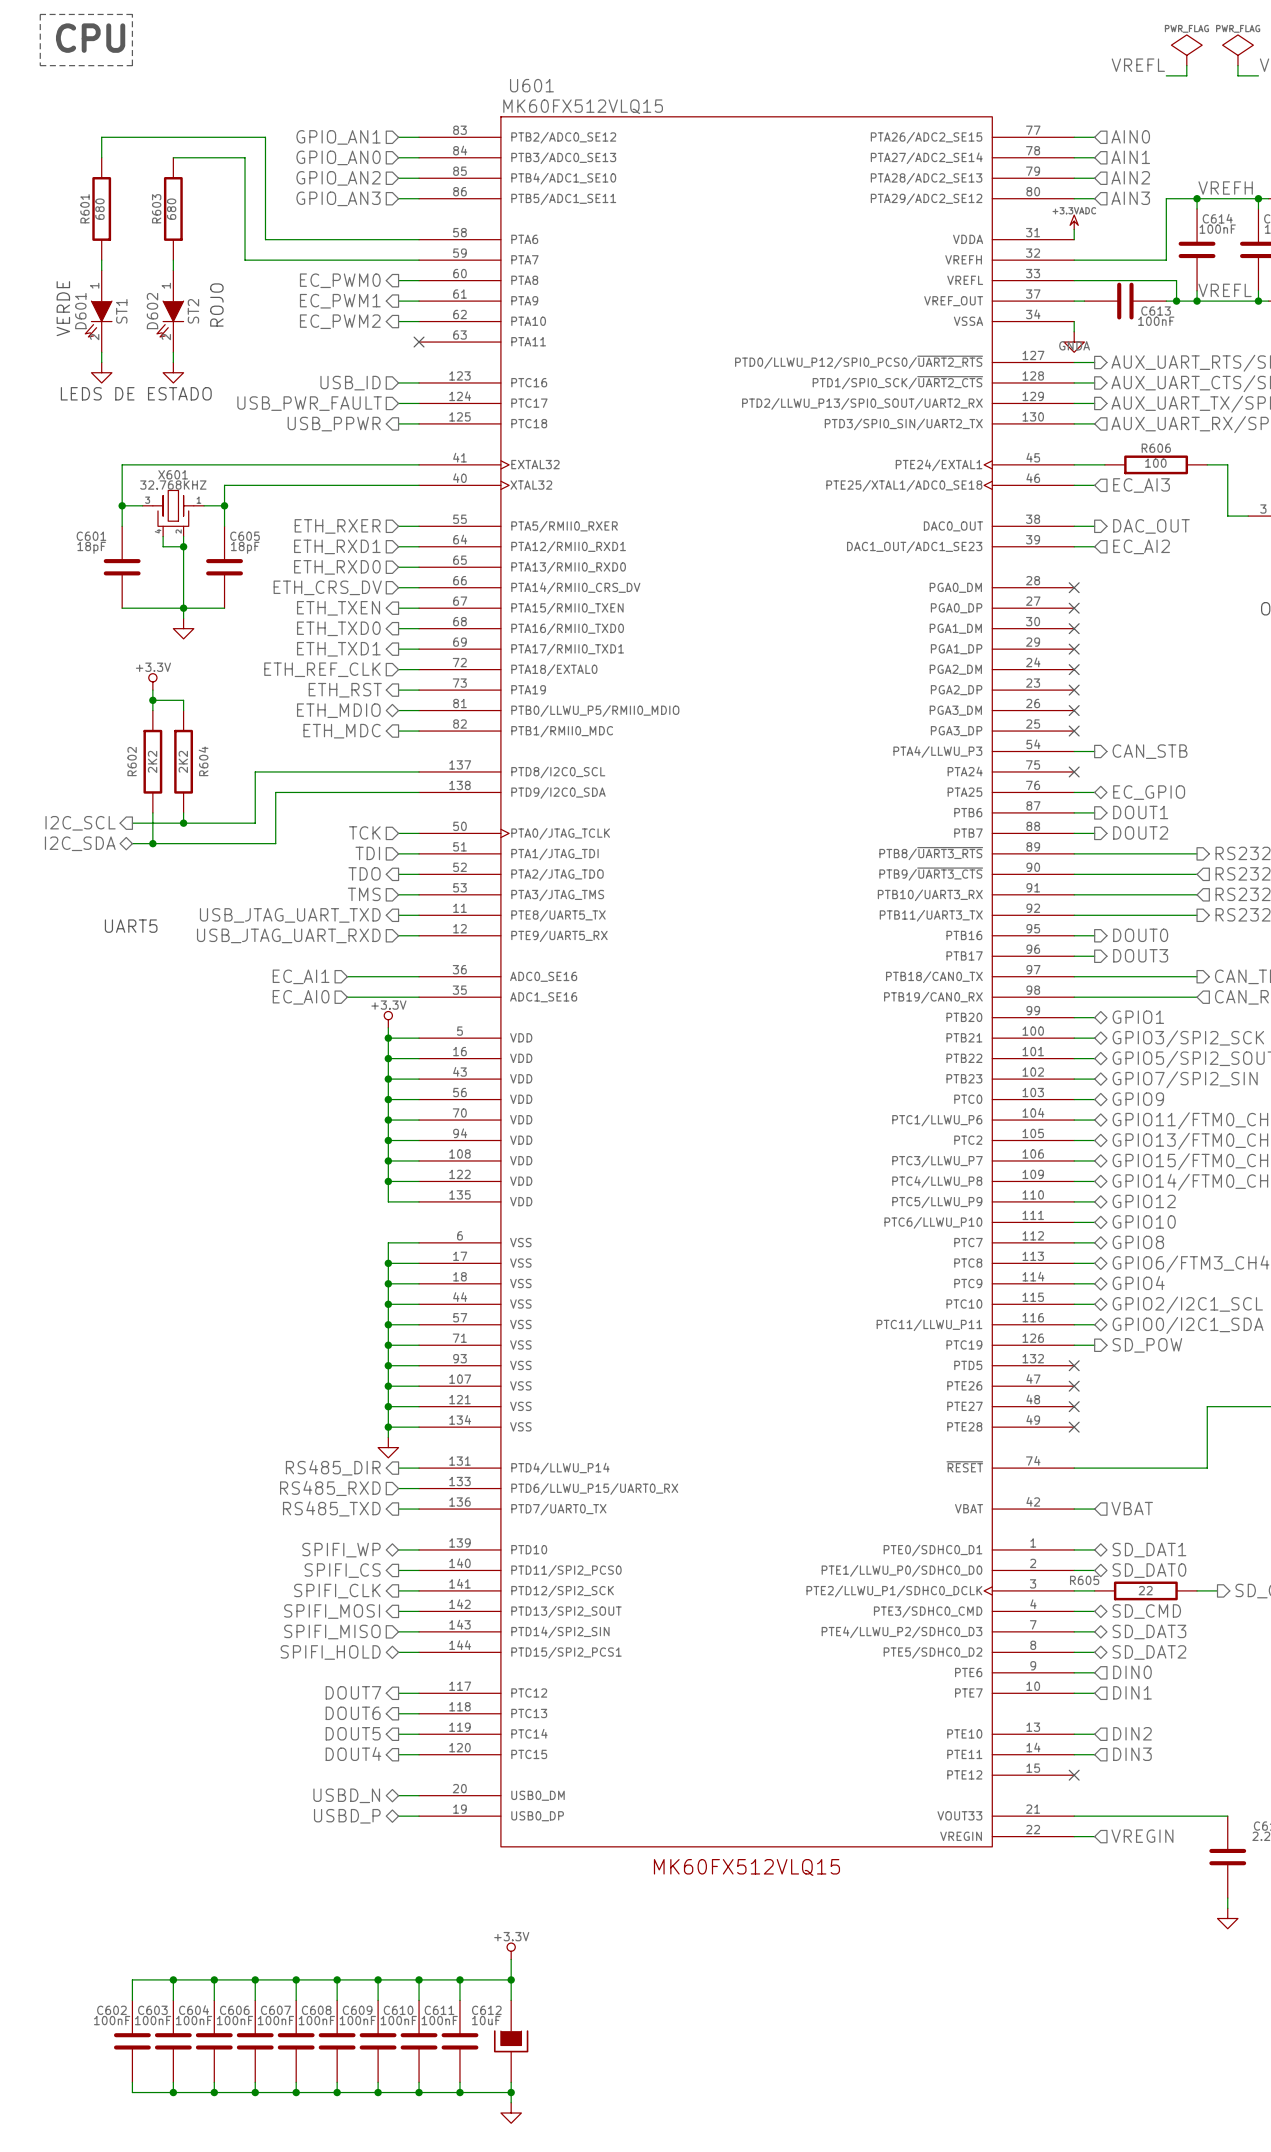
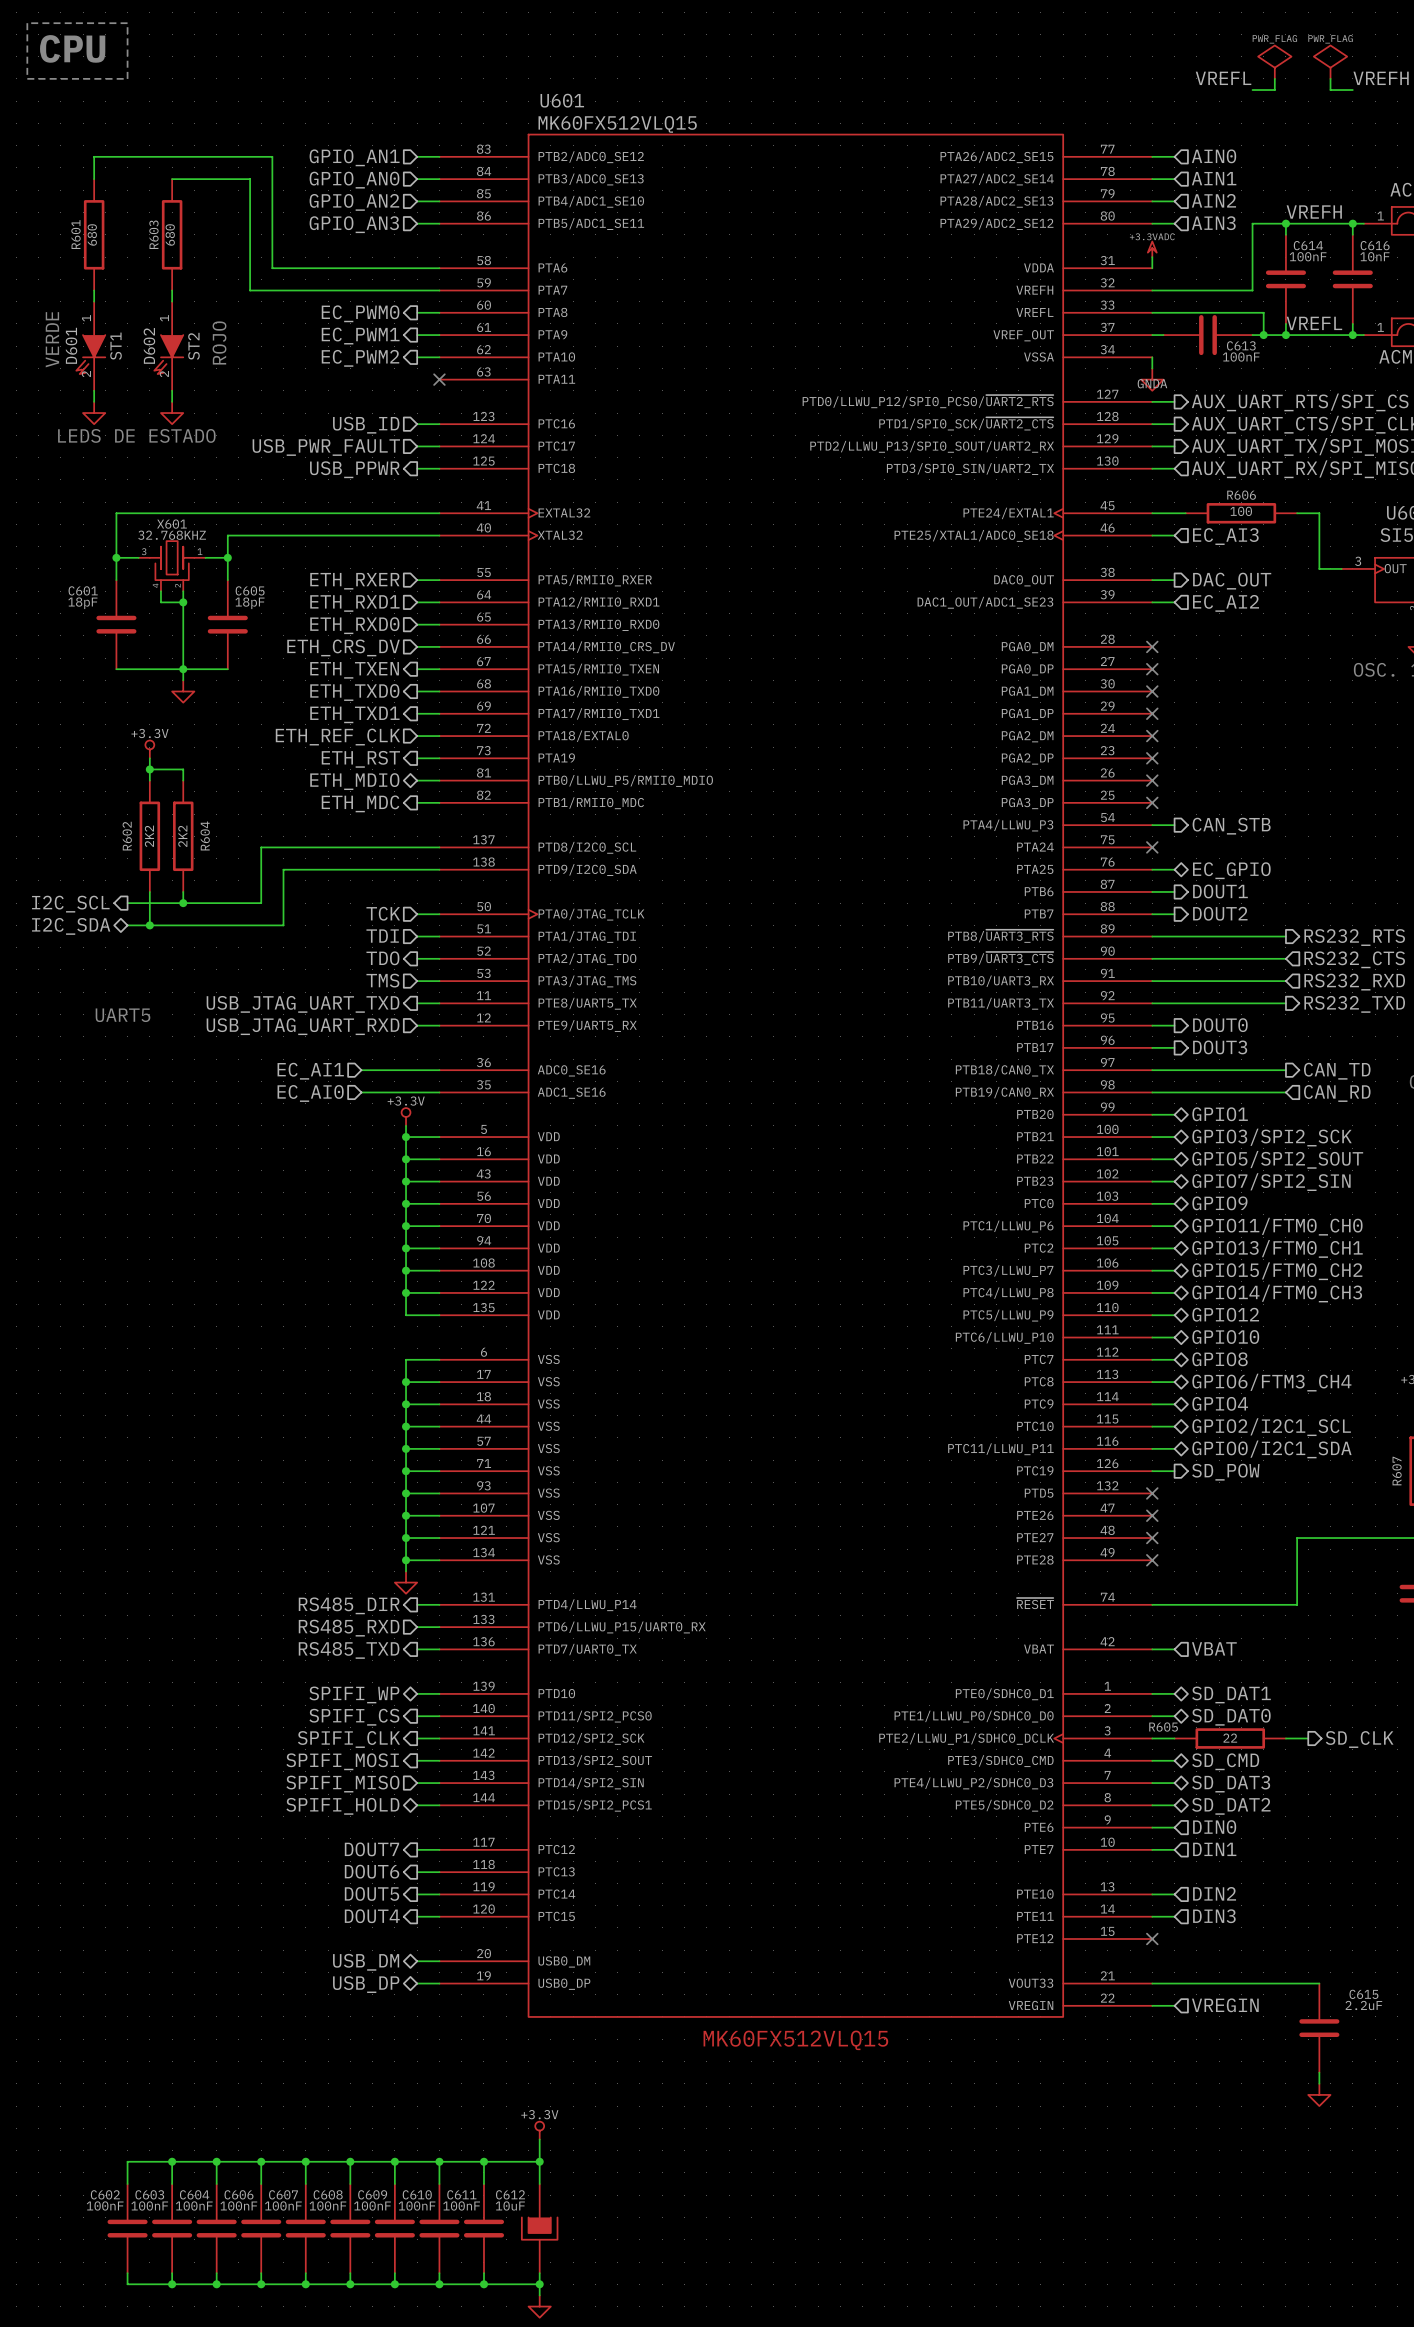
hierarchical label: USBD_N (346, 1795) -> USB_DM (366, 1962)
hierarchical label: USBD_P (347, 1816) -> USB_DP (366, 1984)

